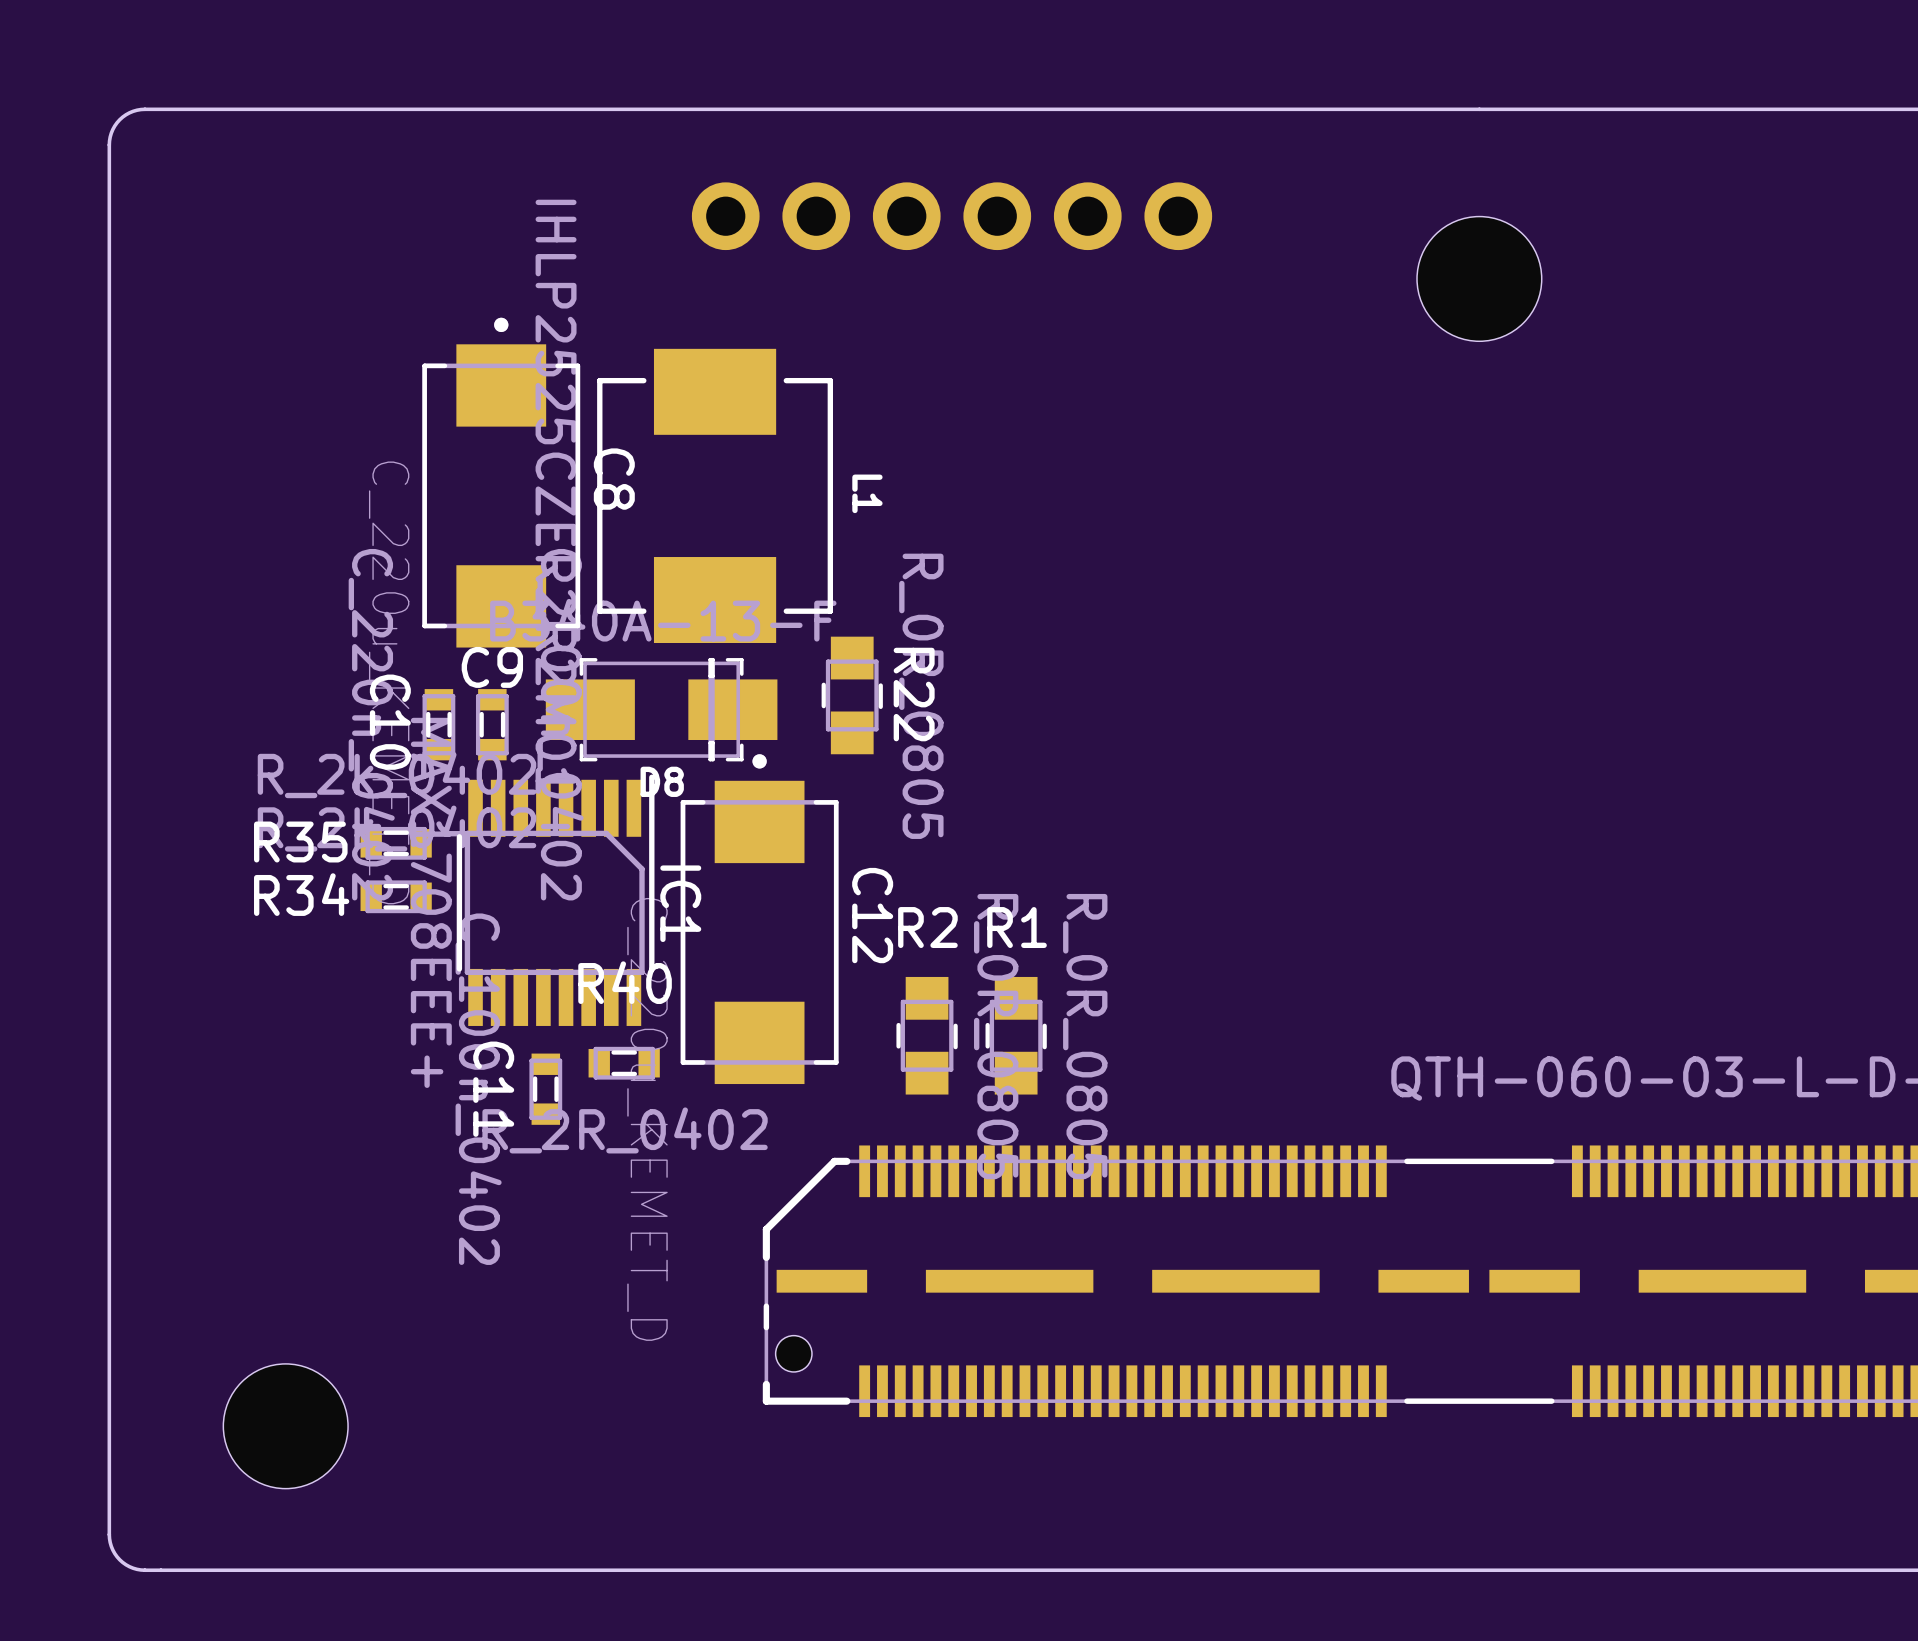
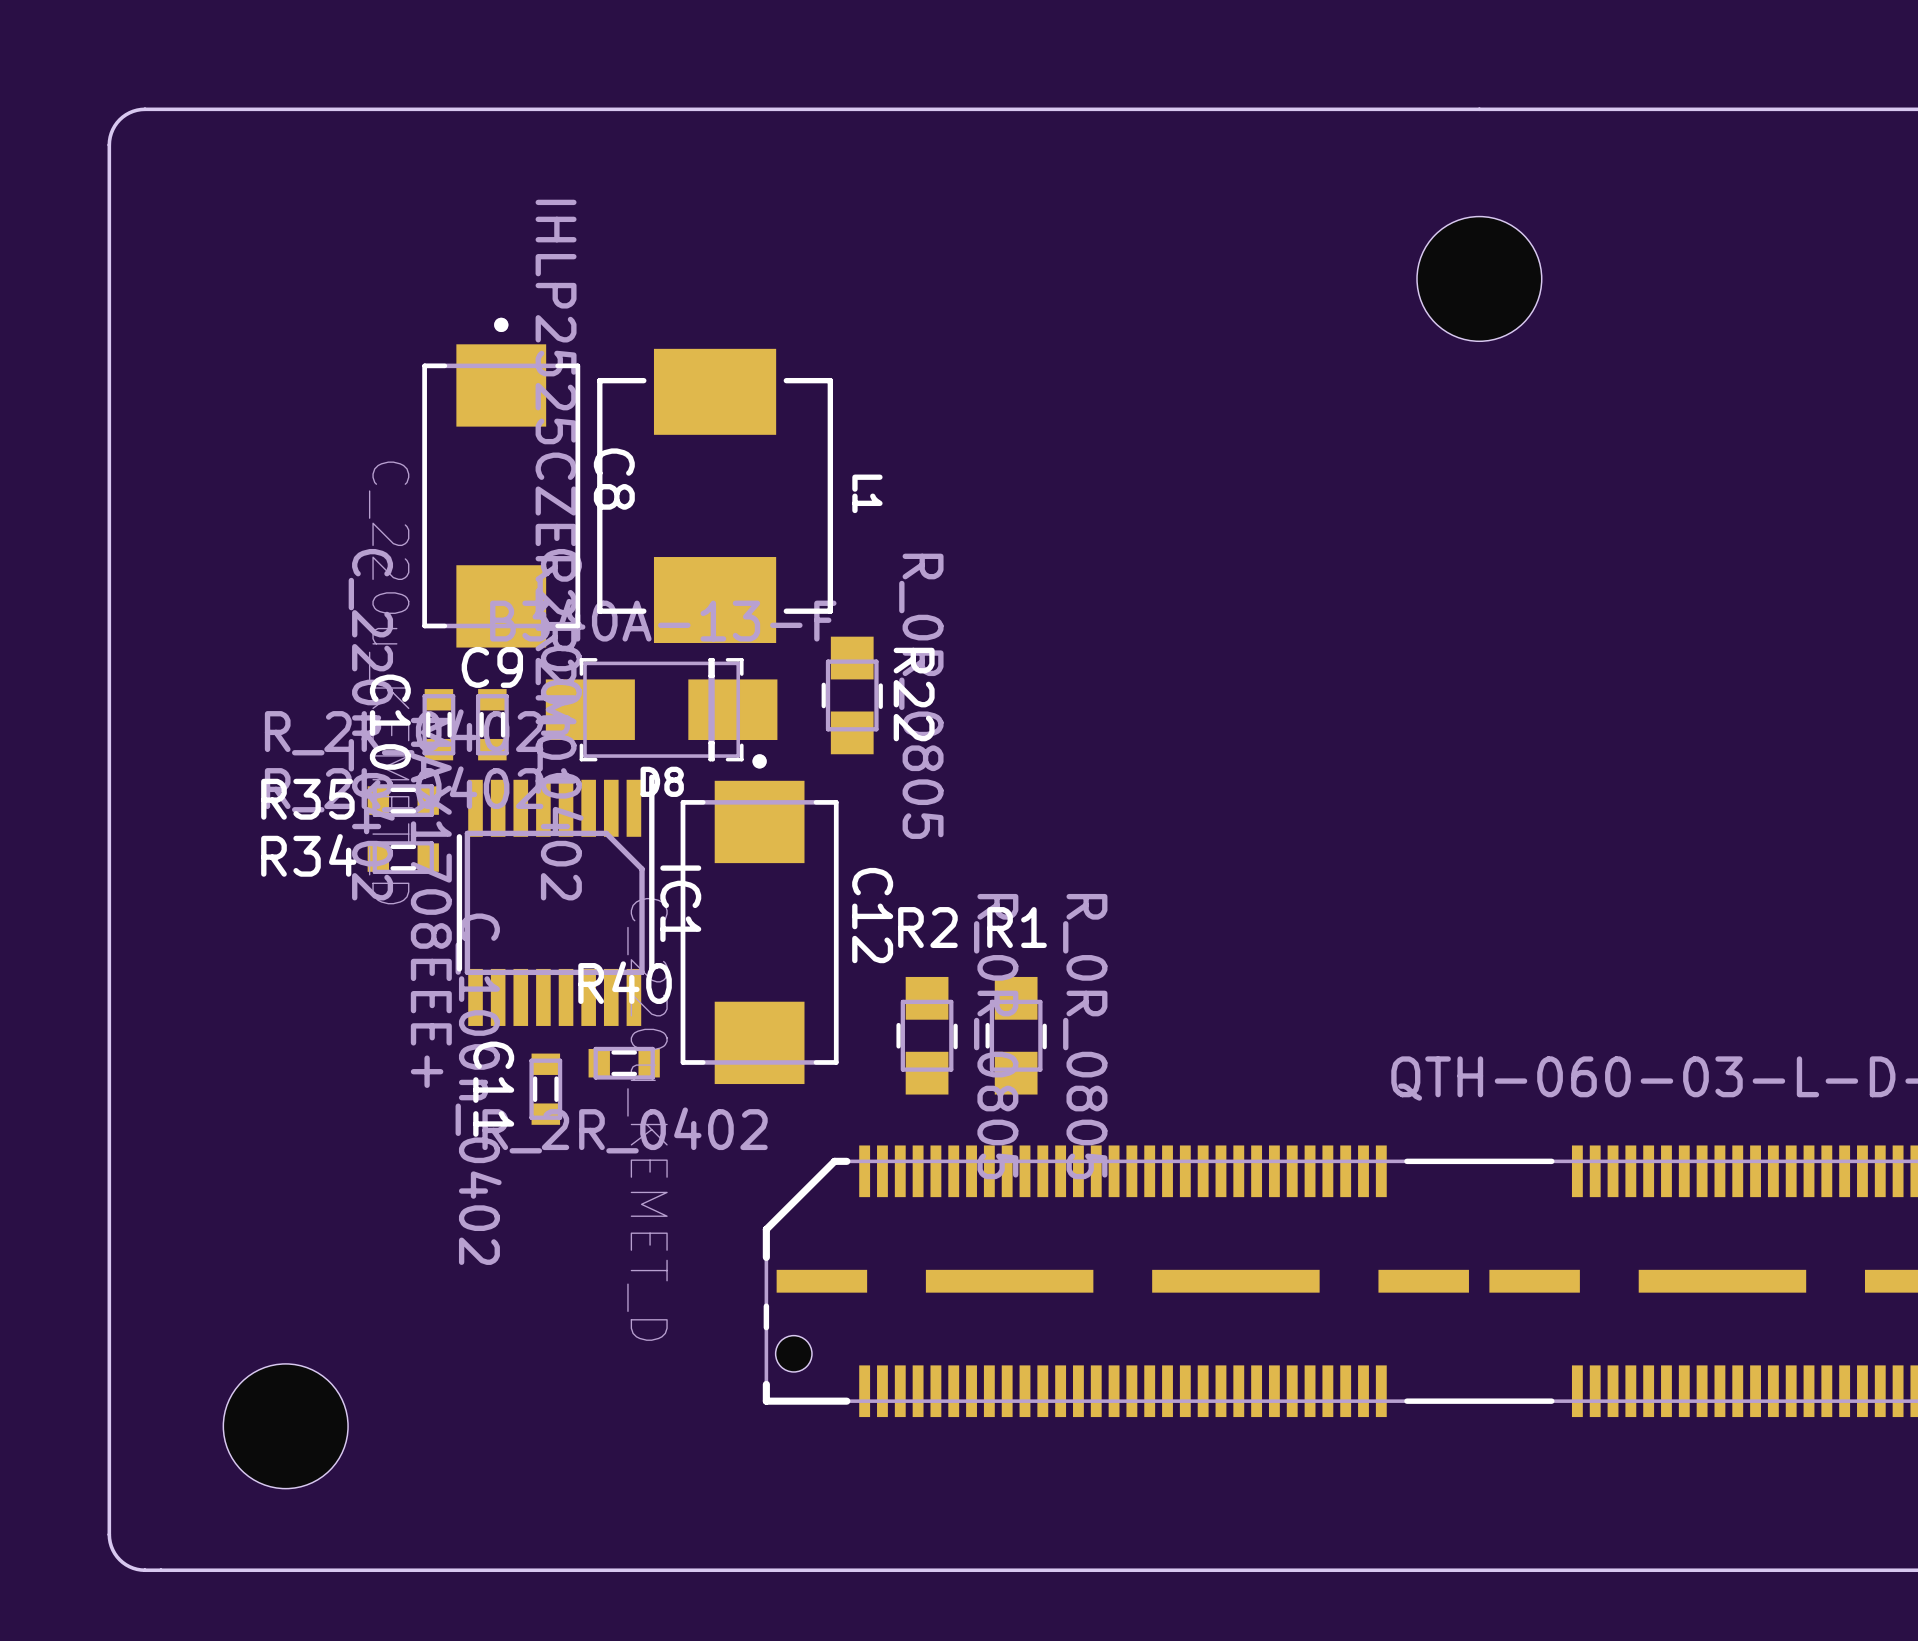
part: (952, 216) -> none
R35 position: (396, 843) -> (403, 800)
R34 position: (396, 896) -> (403, 857)

